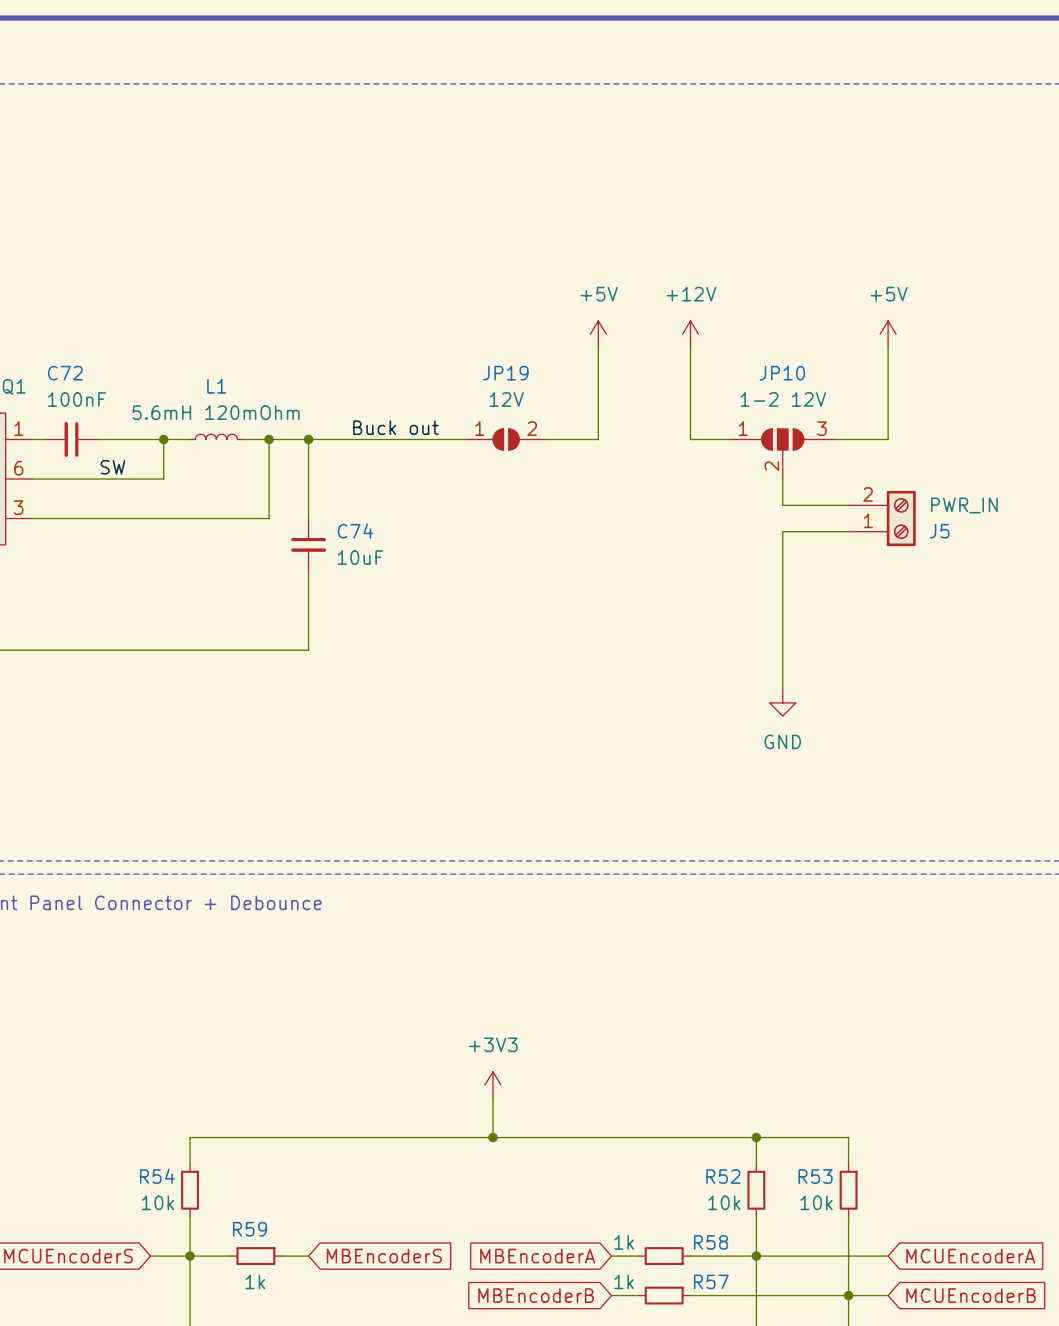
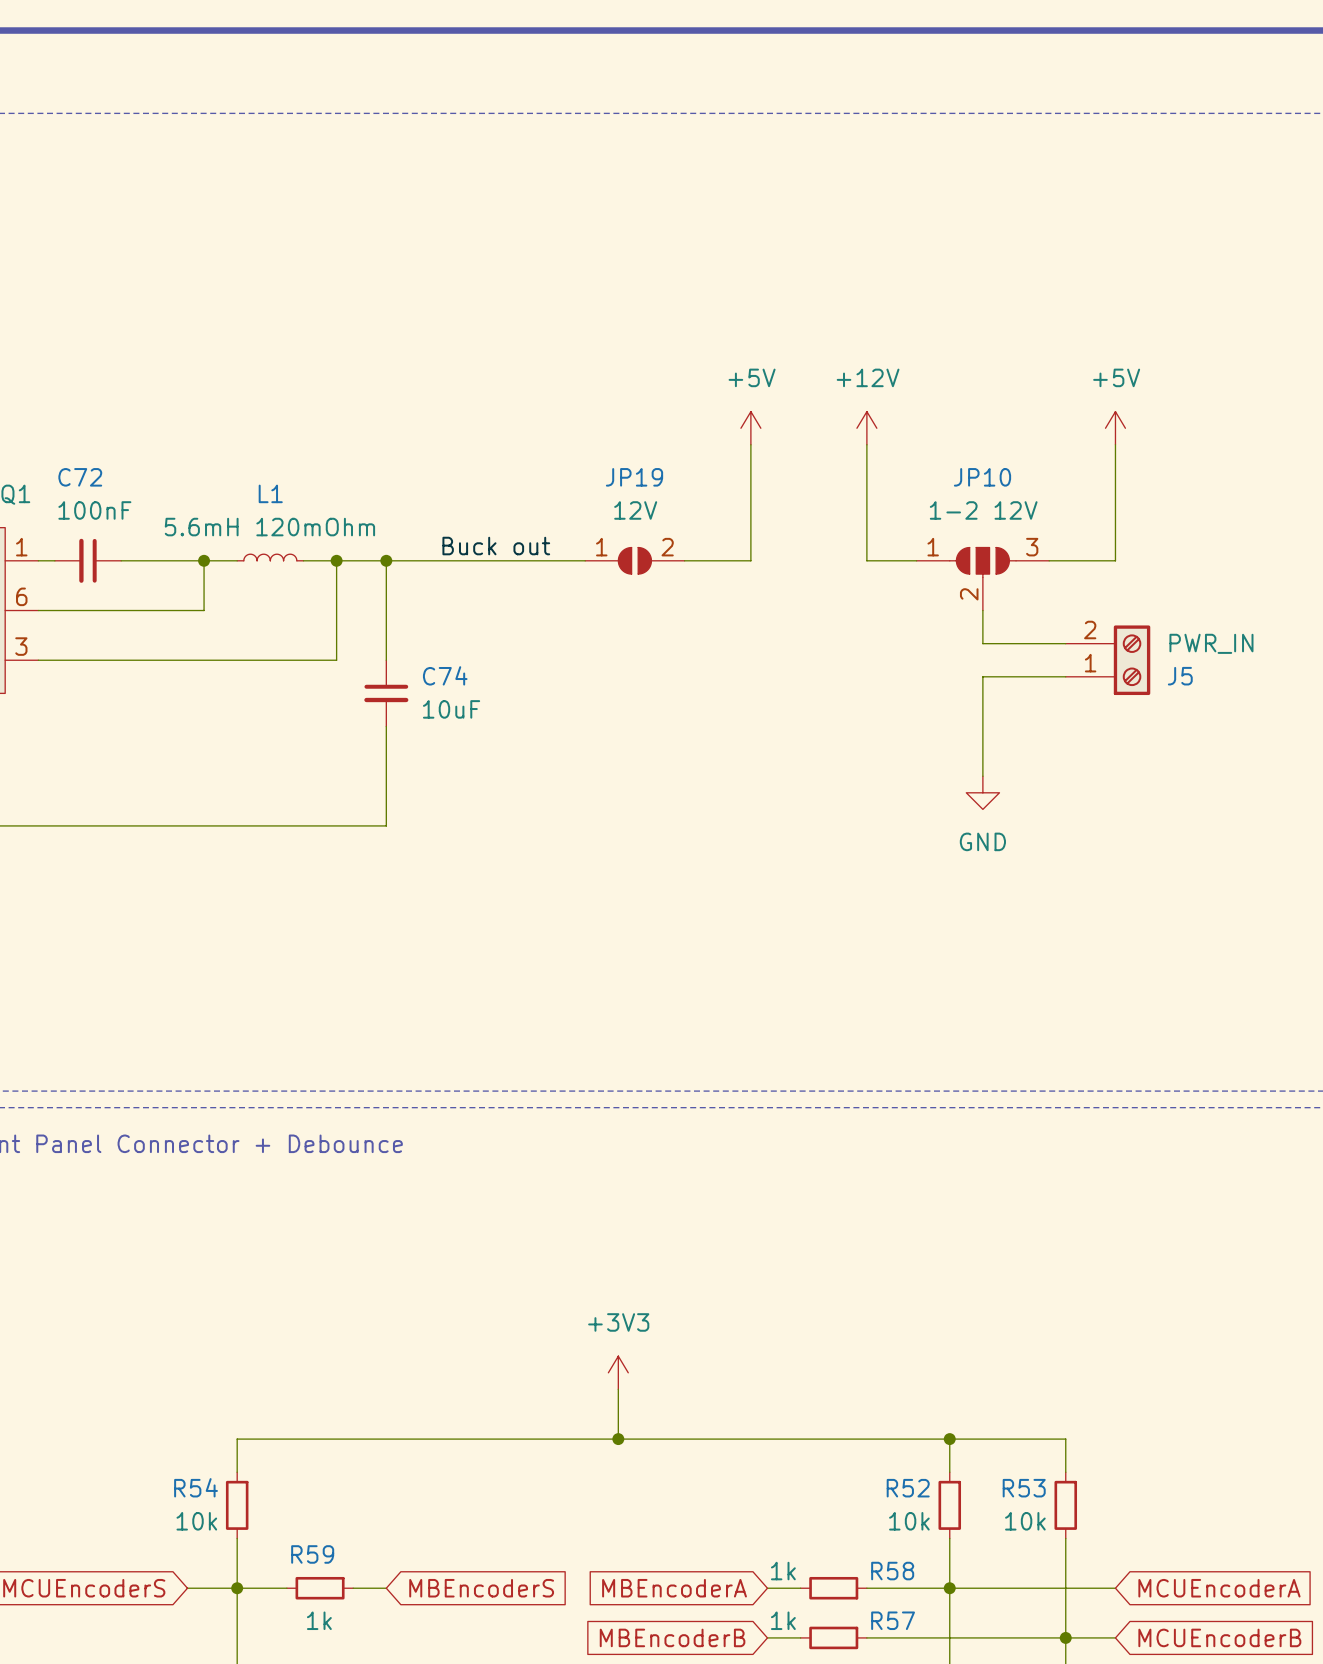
label: SW (113, 467) -> none
wire: (782, 610) (782, 689) -> none
power symbol position: GND (782, 702) -> GND (982, 792)

